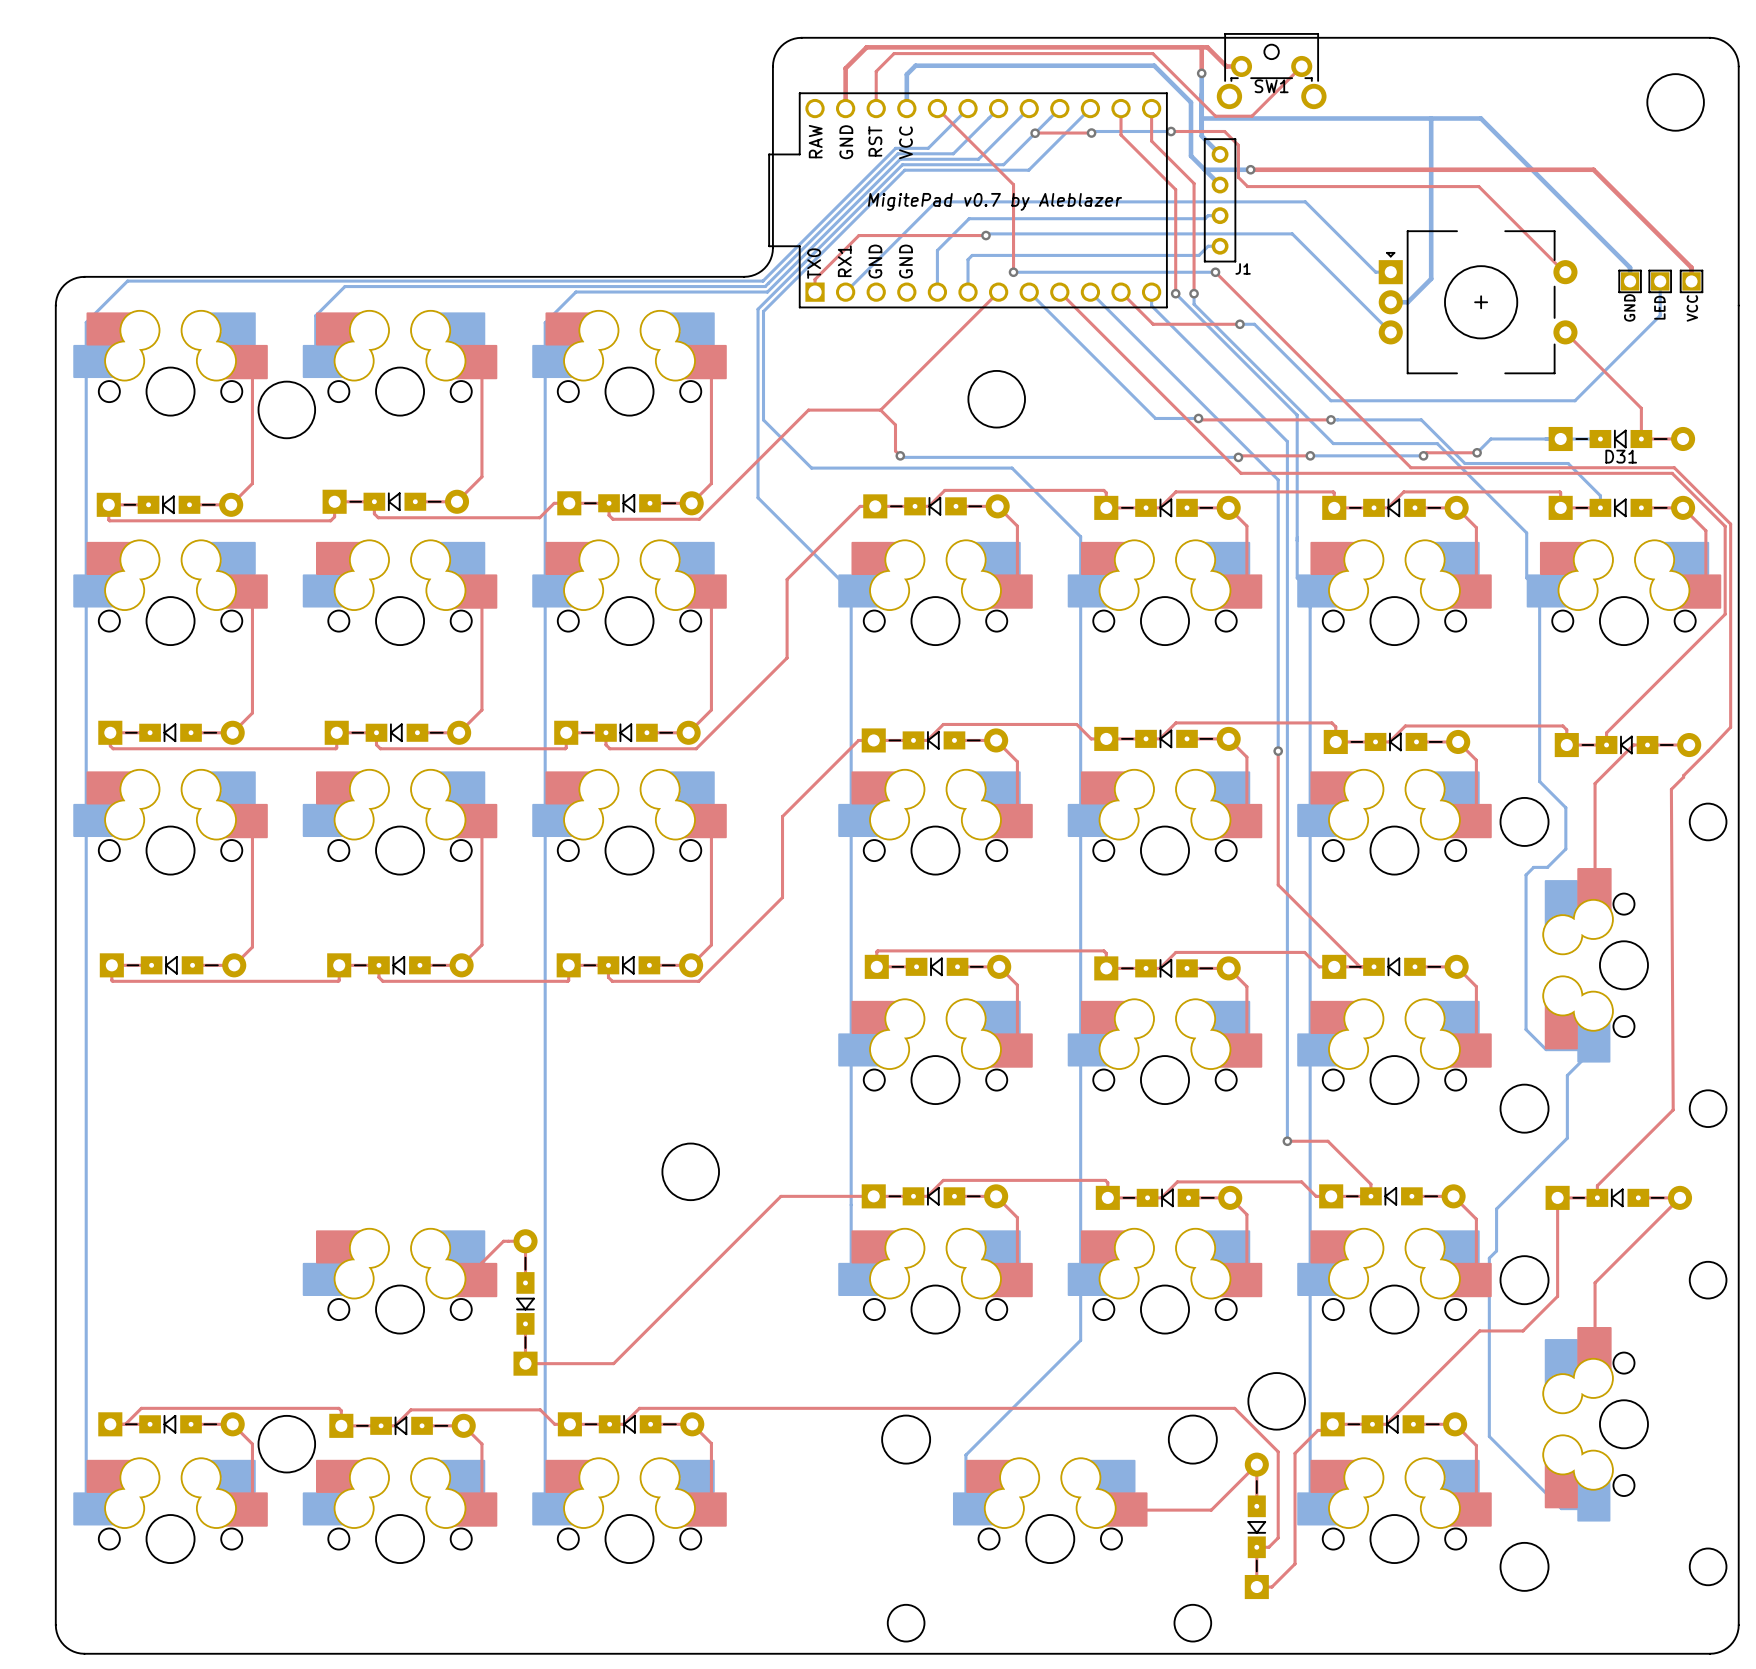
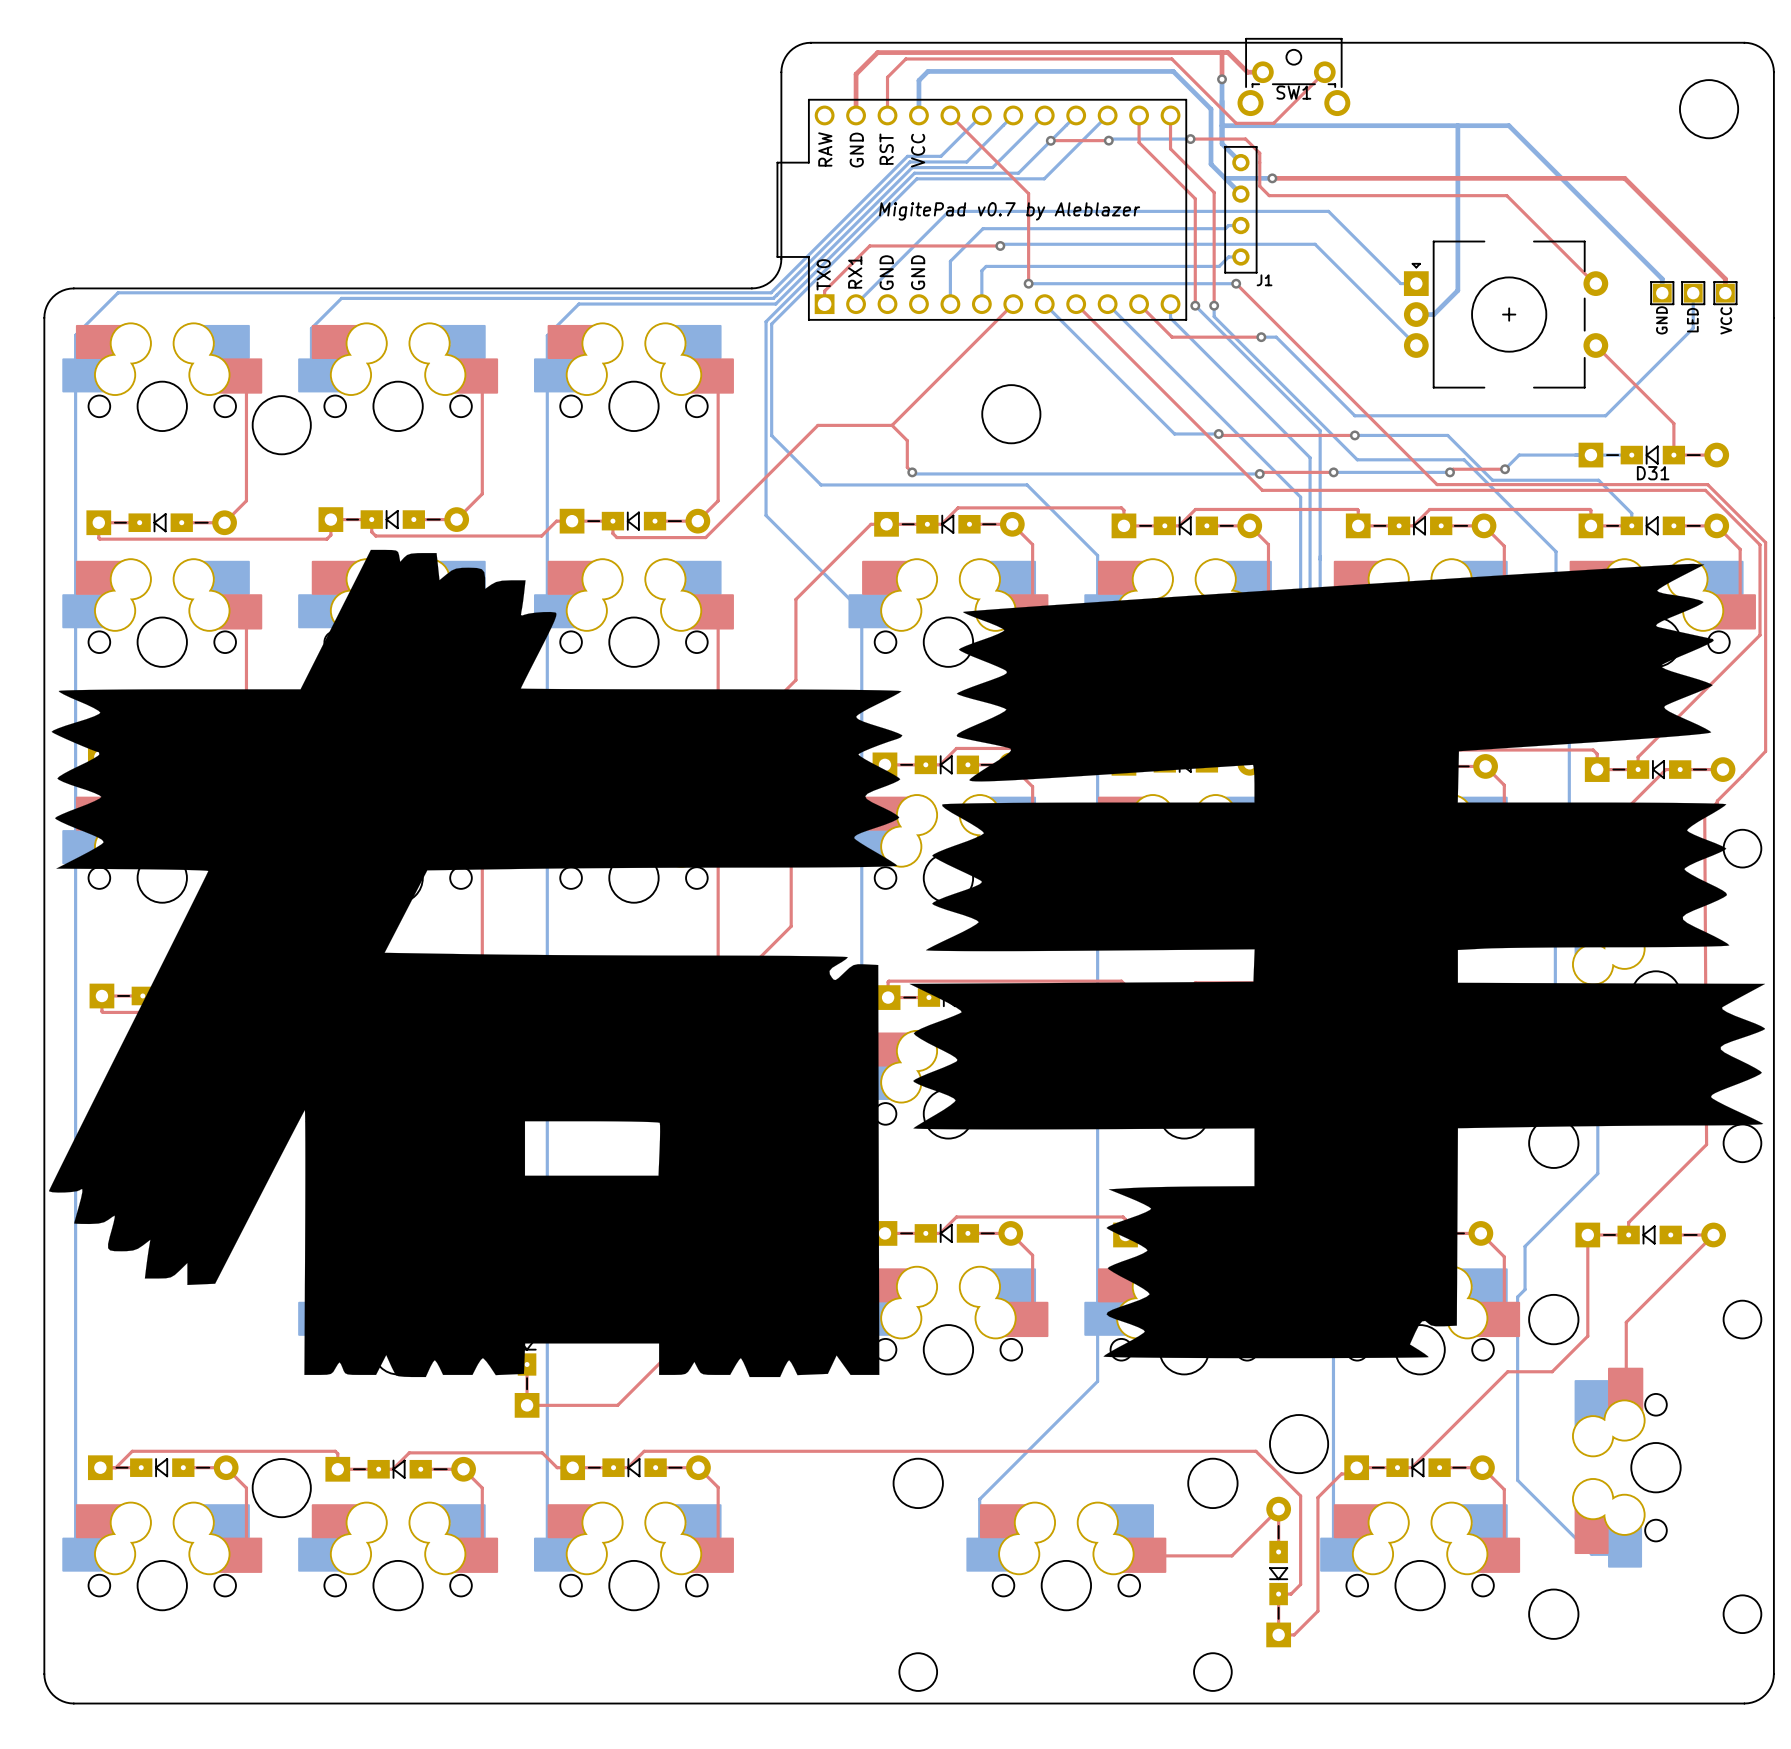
drawing: none -> [49, 549, 1766, 1378]

